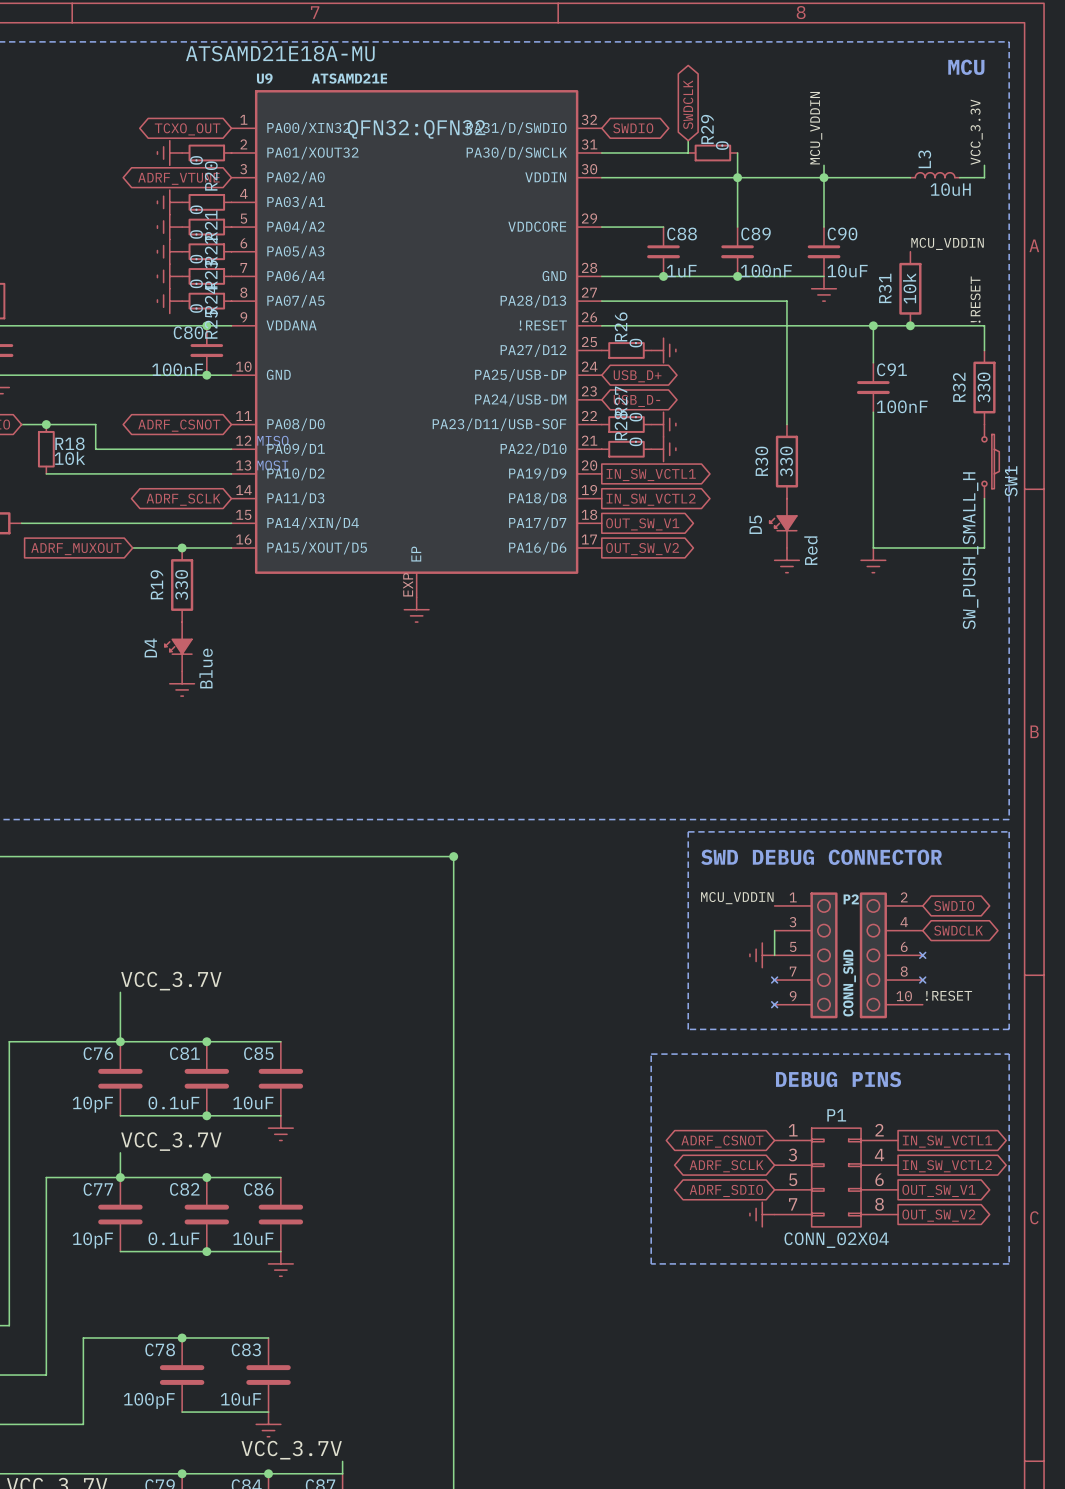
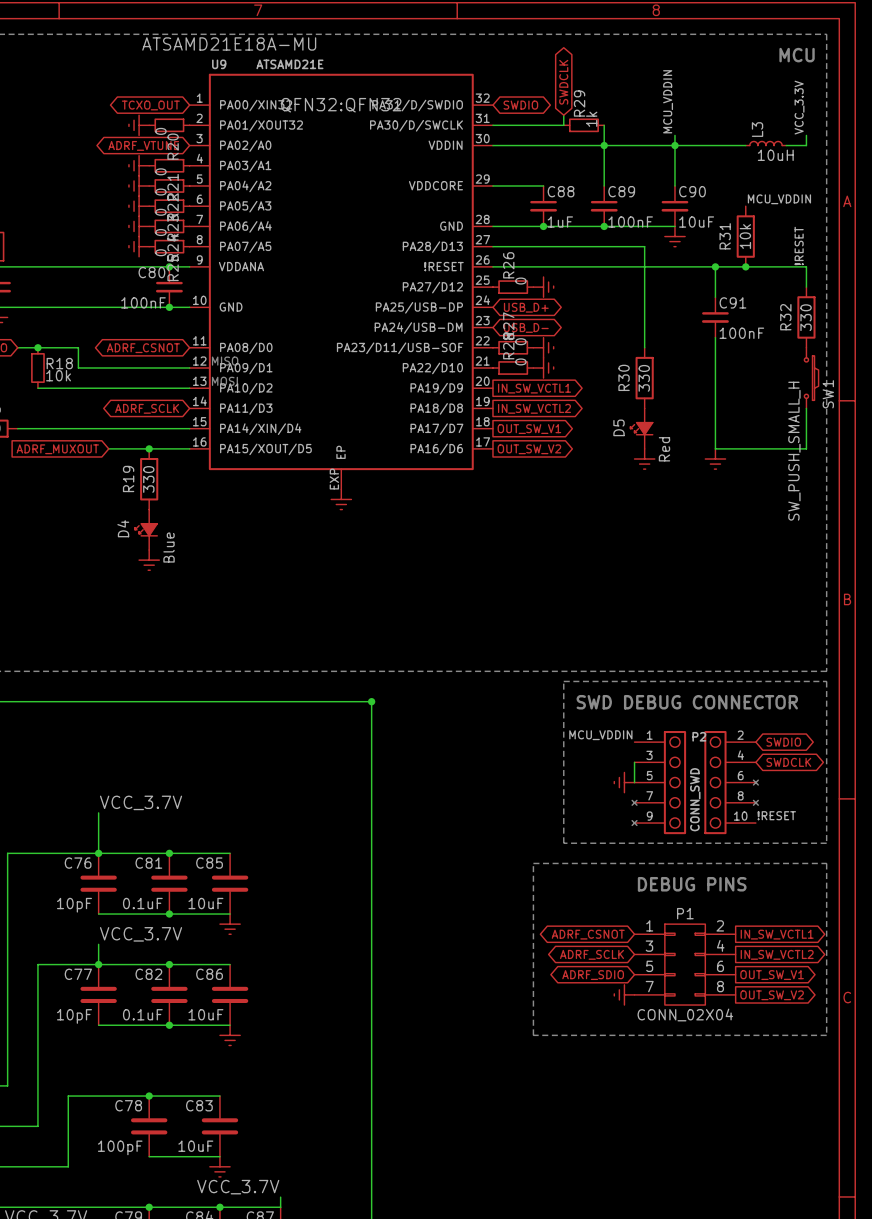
R29 value: 0 (722, 145) -> 1k (591, 119)

